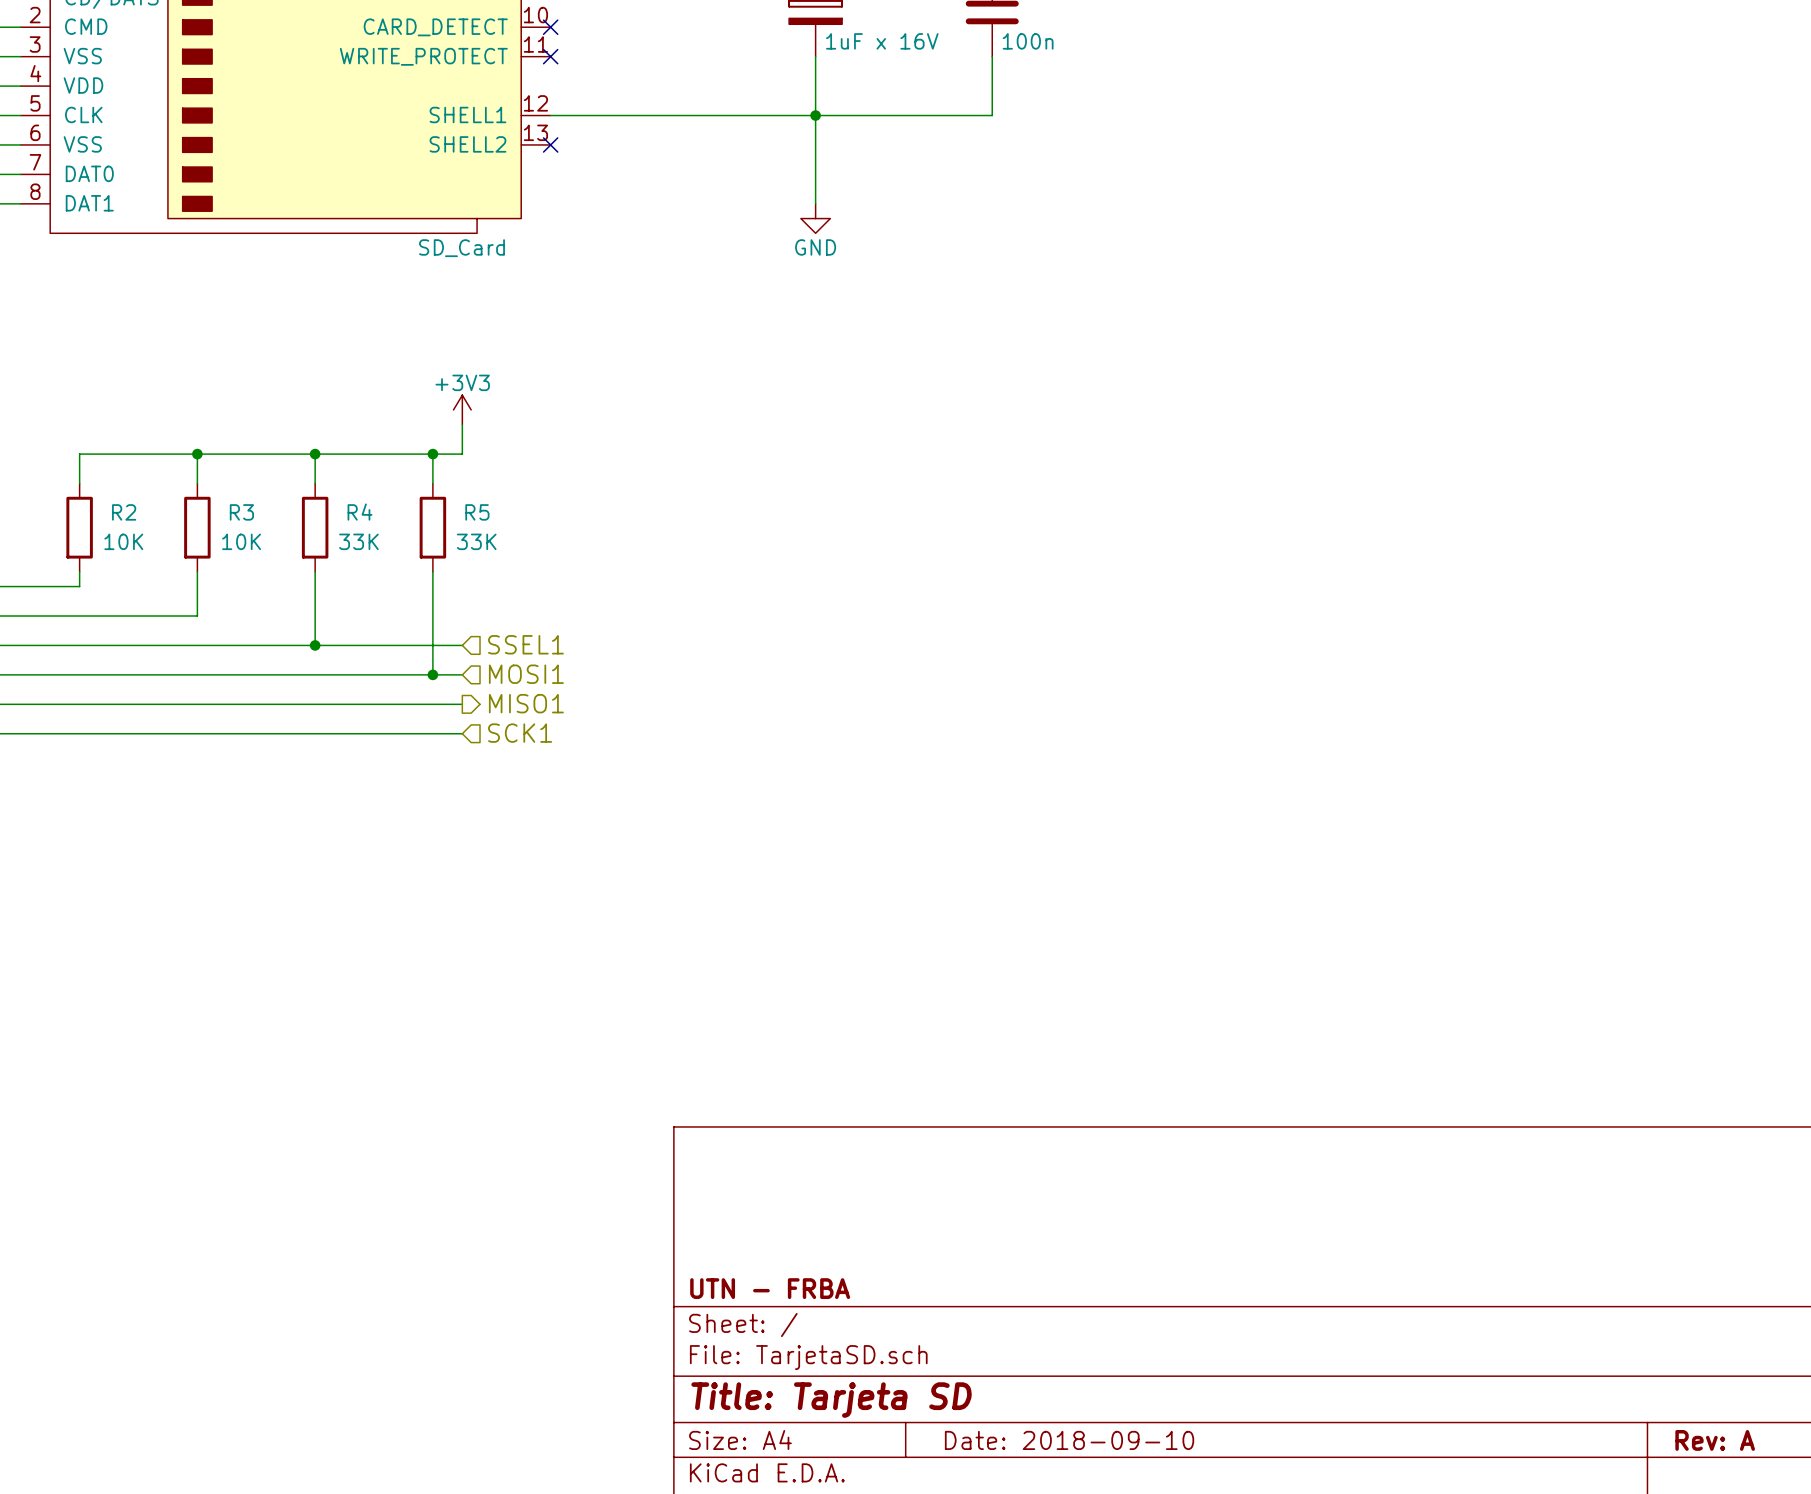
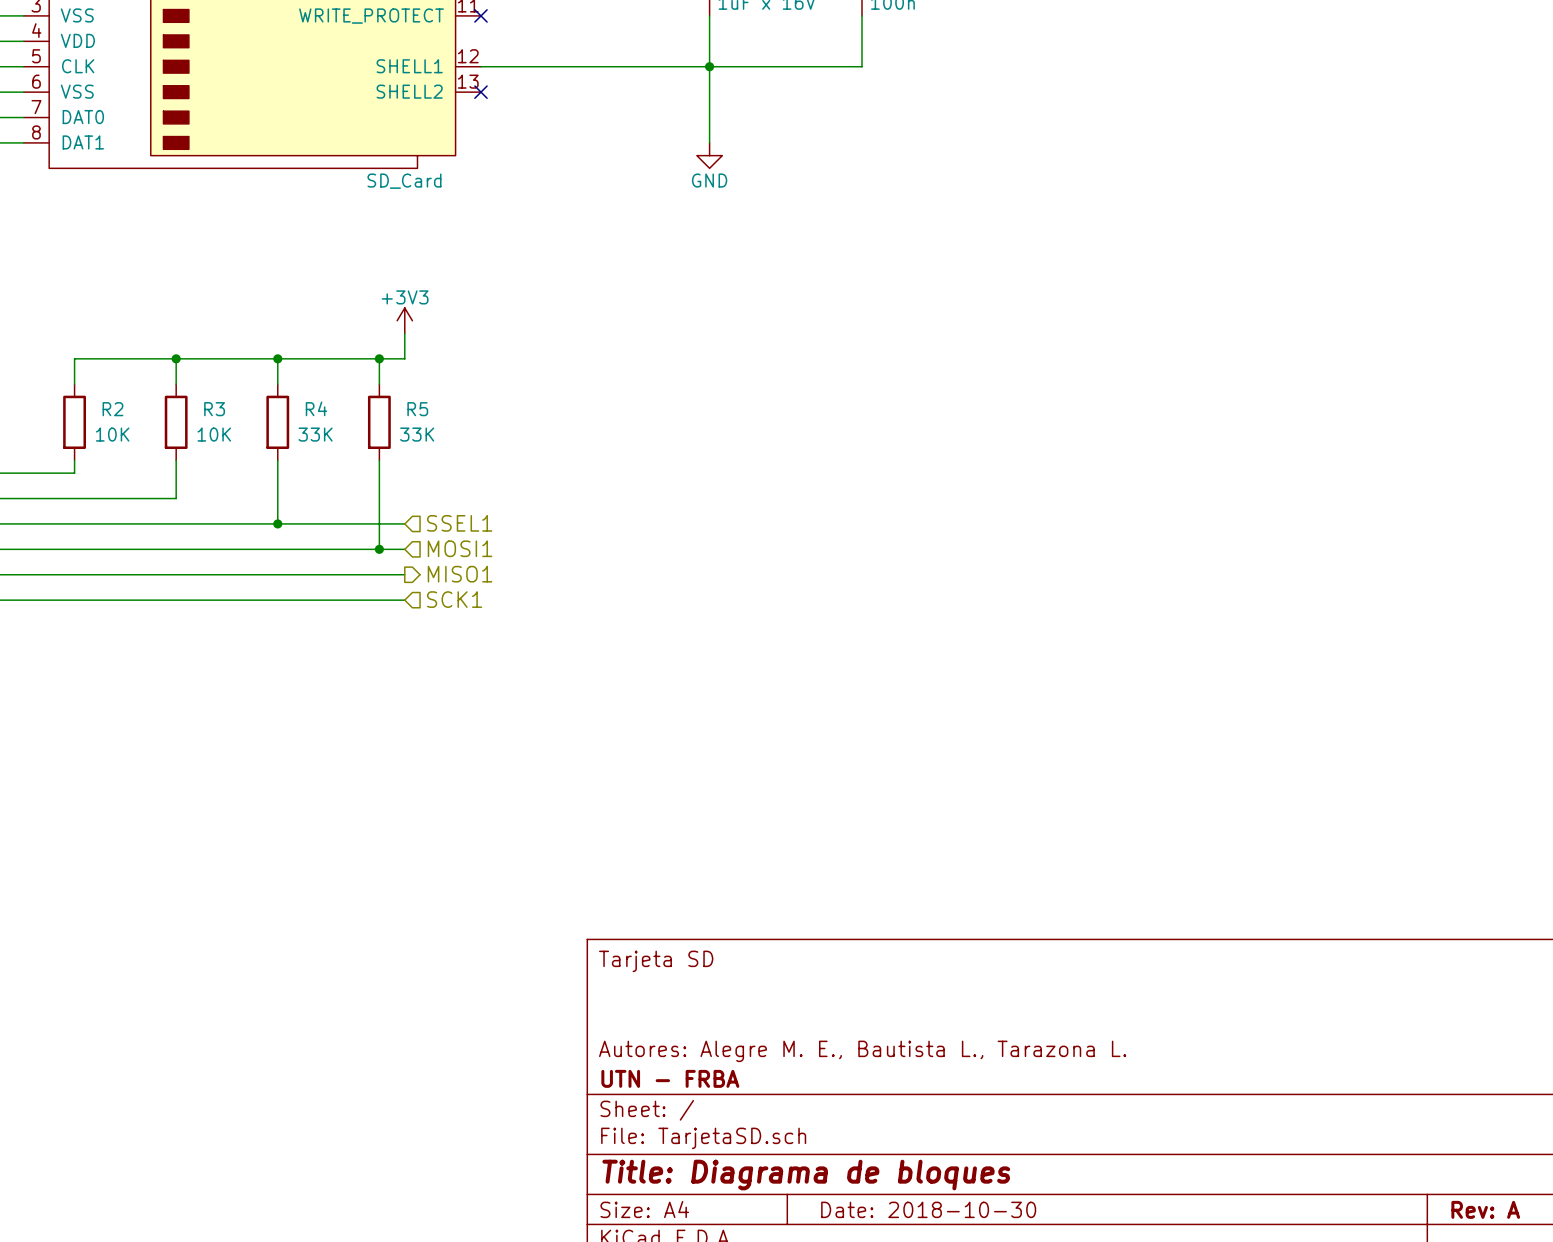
title block: none -> Tarjeta SD (656, 961)
title block: none -> Autores: Alegre M. E., Bautista L., Tarazona L. (862, 1051)
title block: Title: Tarjeta SD (831, 1400) -> Title: Diagrama de bloques (806, 1175)
title block: Date: 2018-09-10 (1069, 1440) -> Date: 2018-10-30 (928, 1209)

